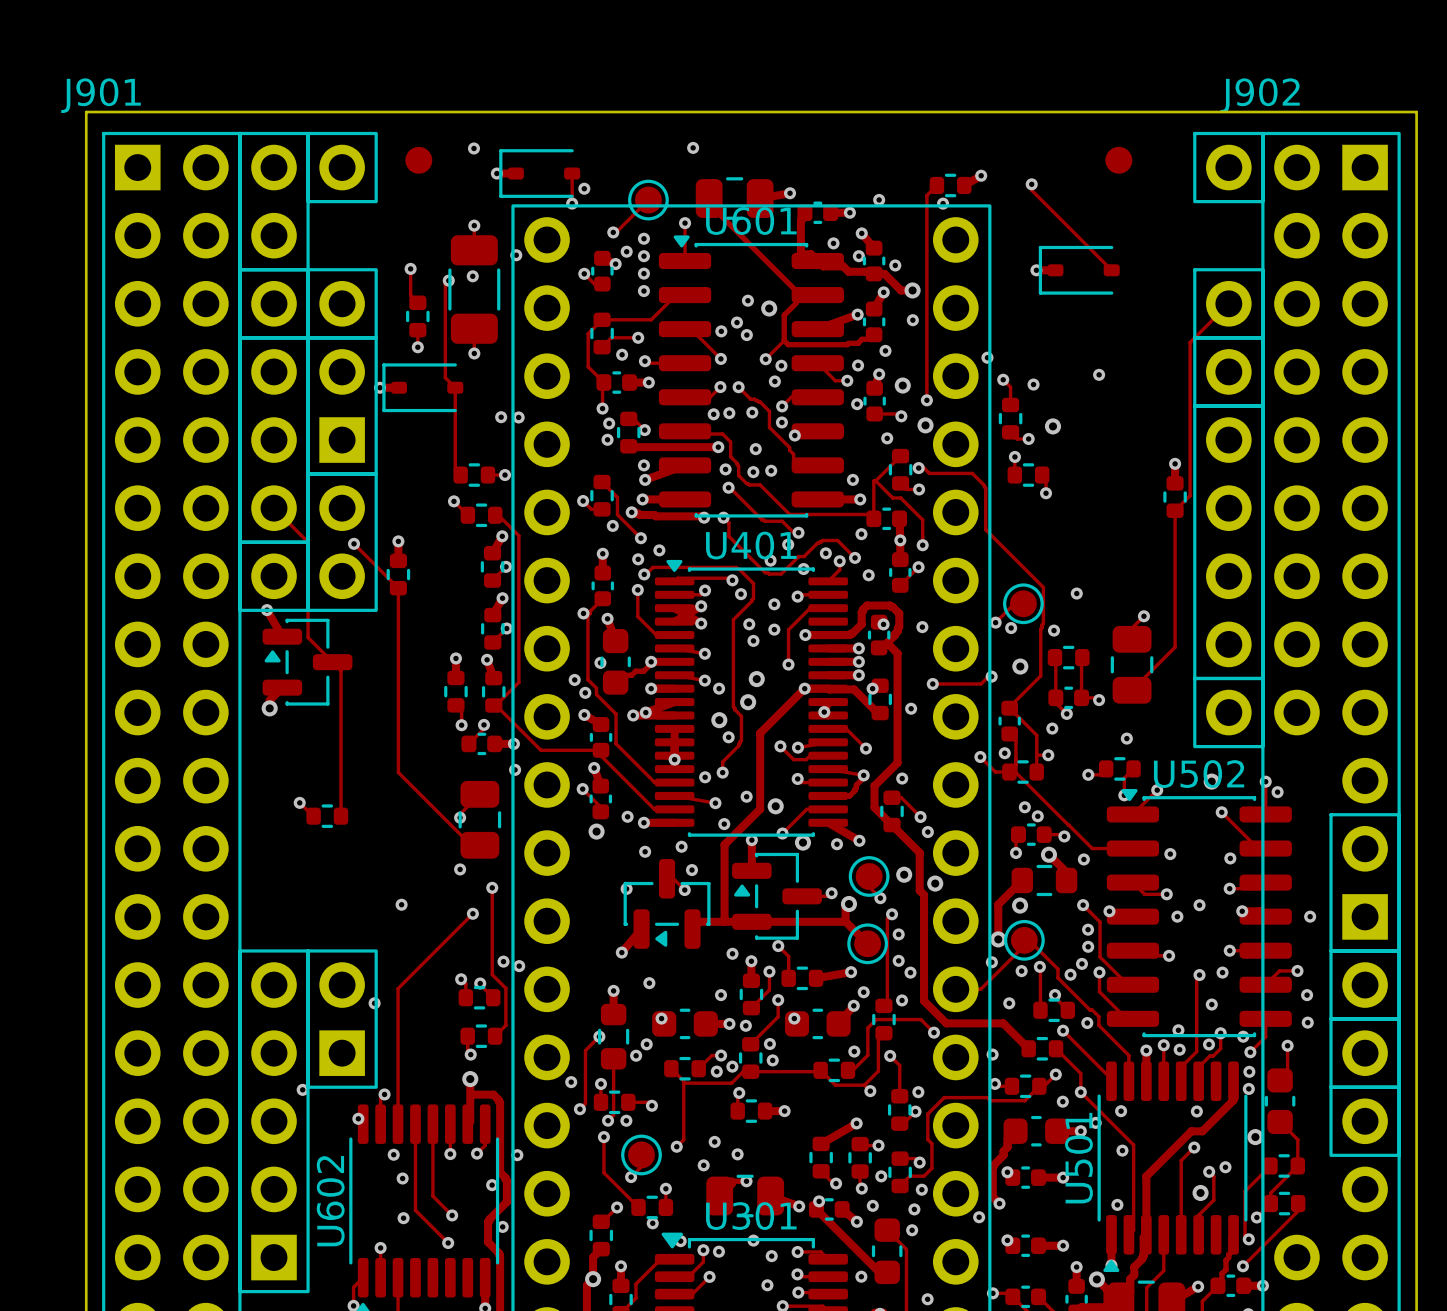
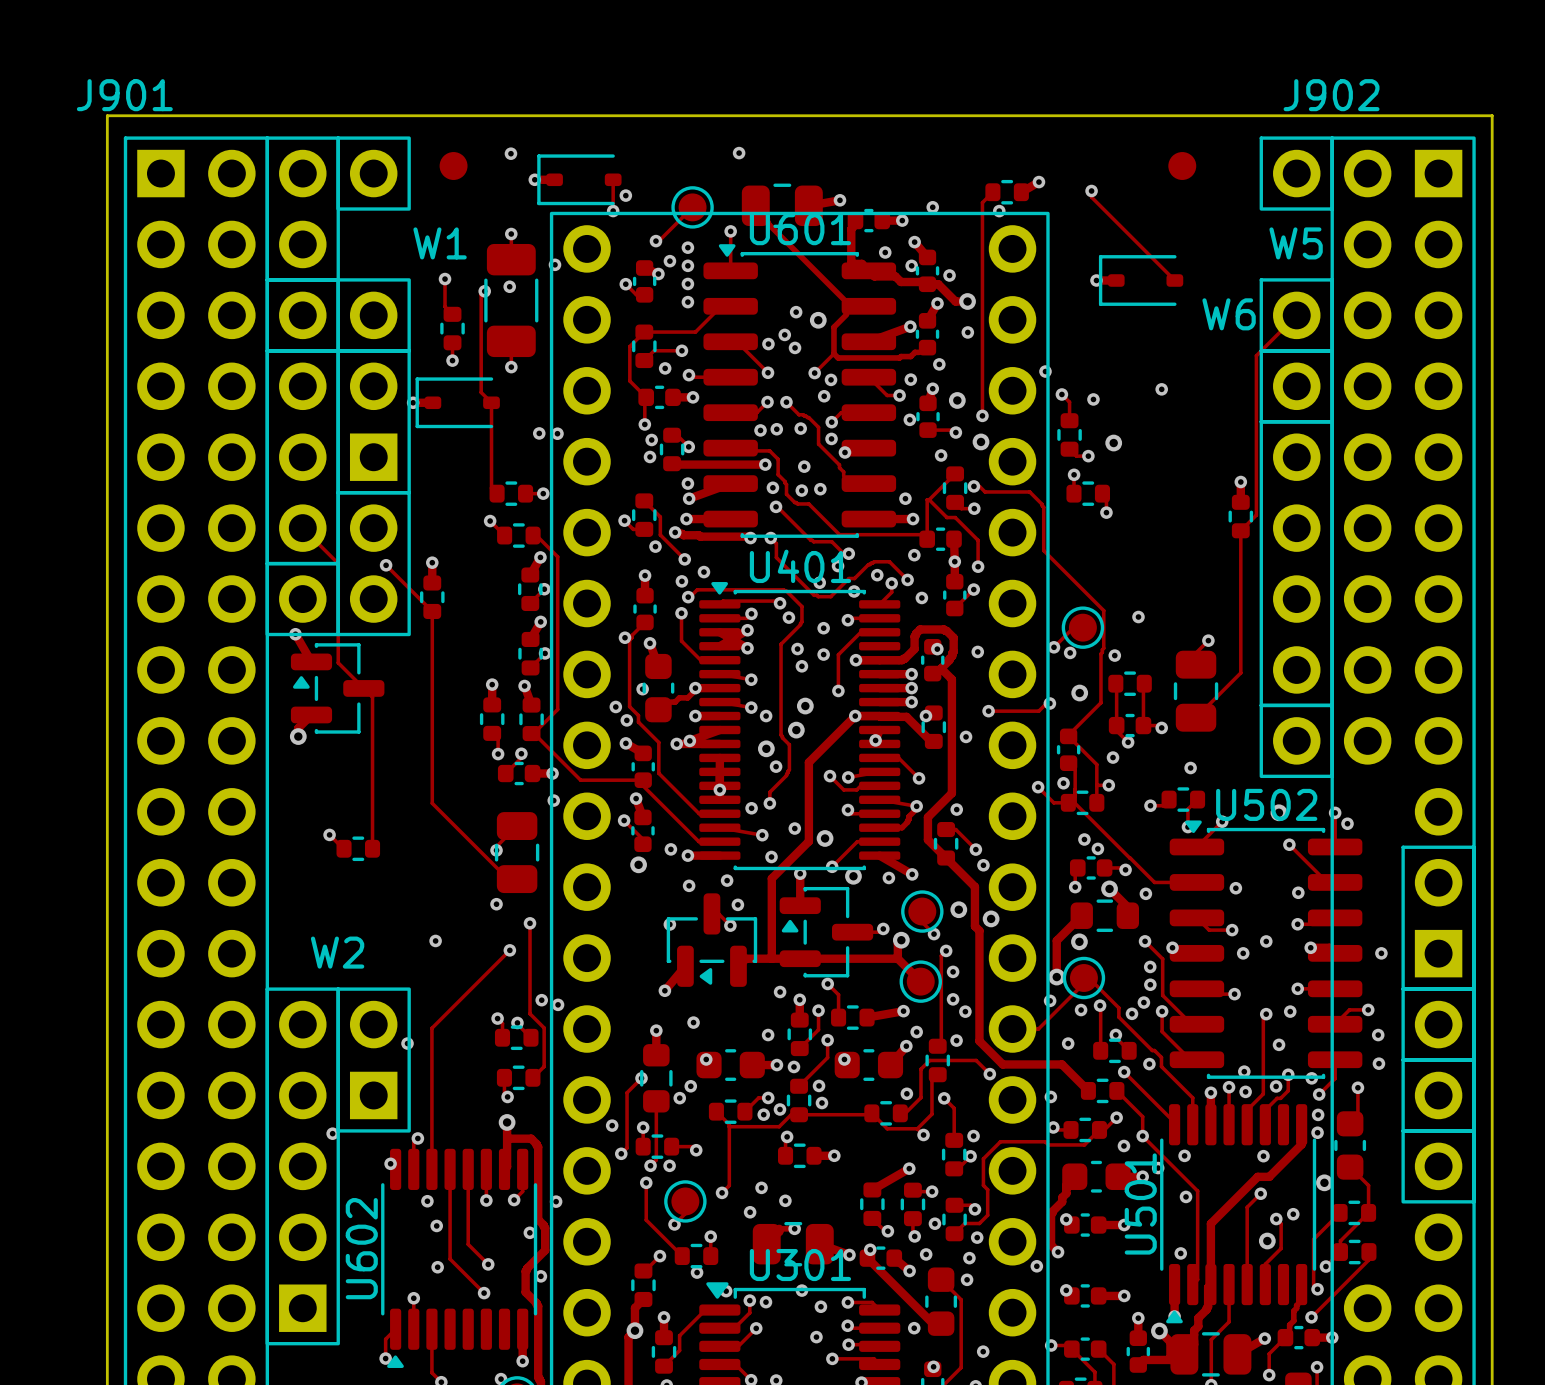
text: none -> W1 (440, 243)
text: none -> W5 (1296, 243)
text: none -> W6 (1229, 314)
text: none -> W2 (337, 952)

